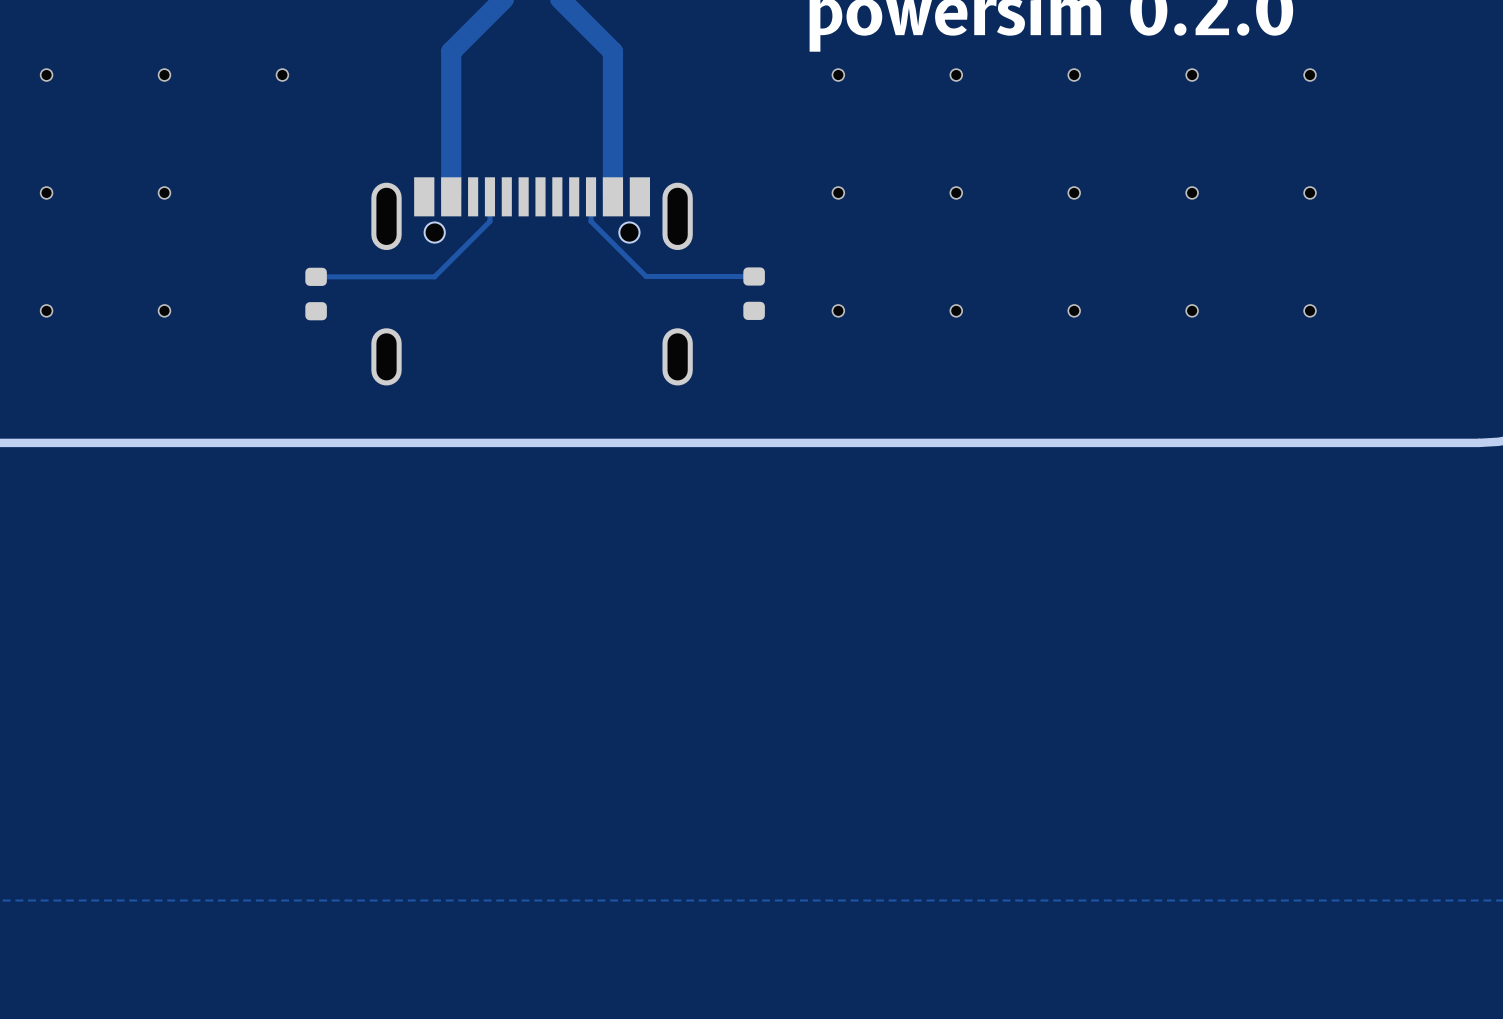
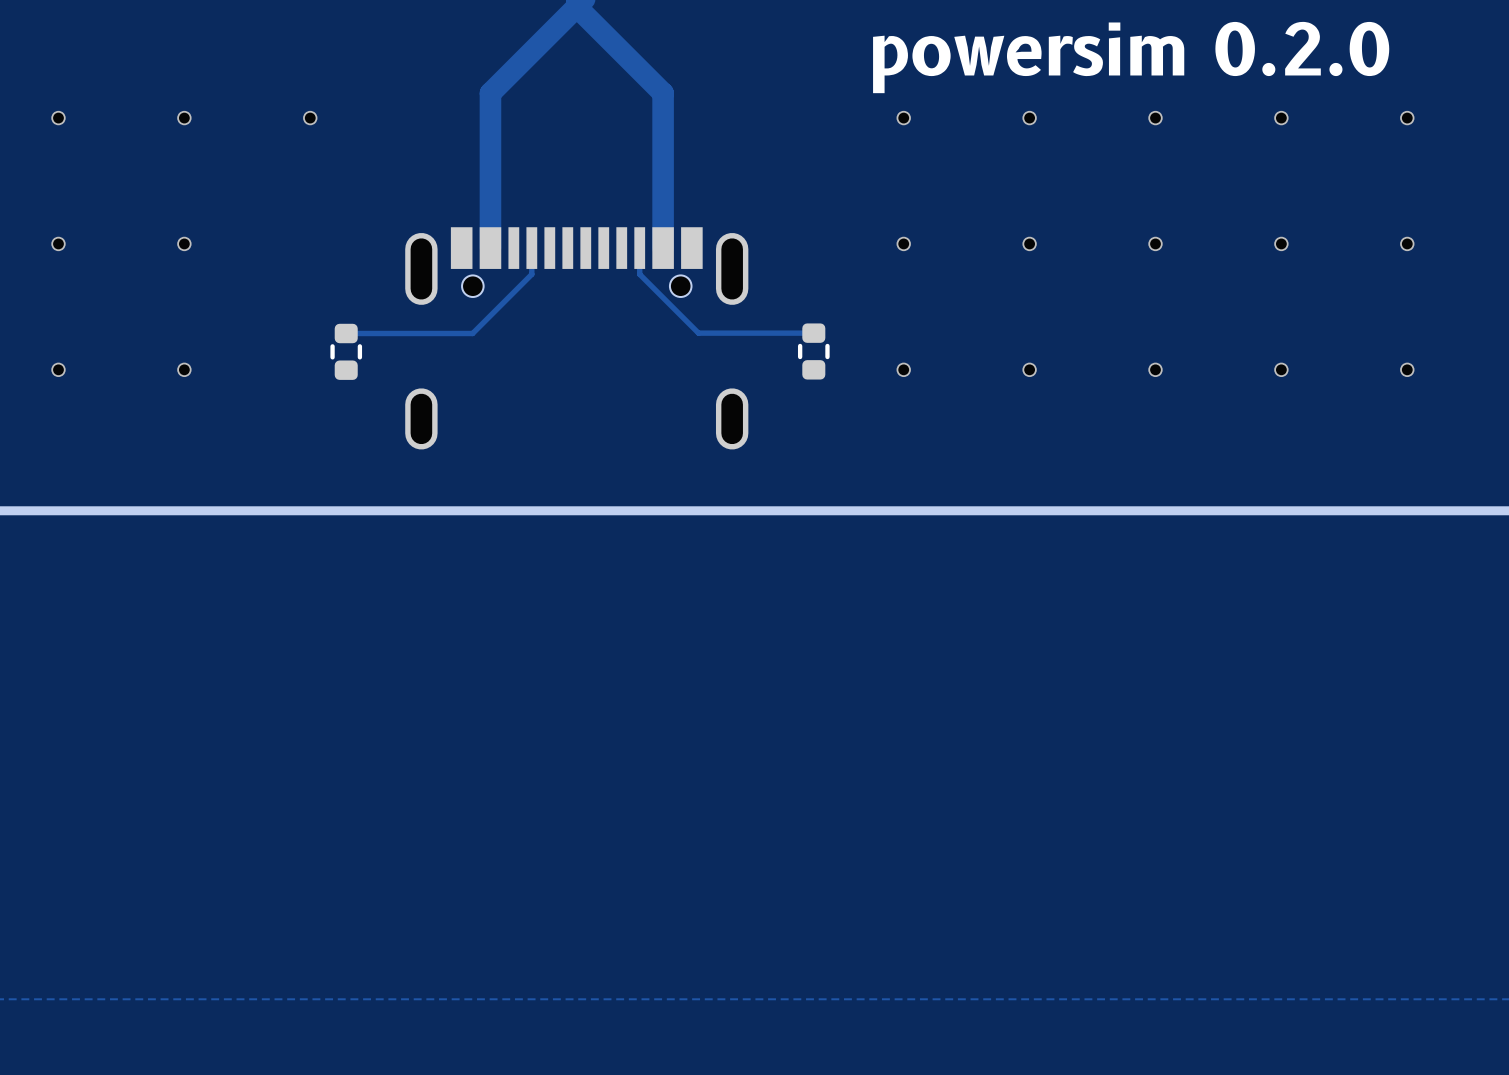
part footprint: [305, 267, 327, 321] -> [330, 323, 363, 380]
part footprint: [743, 267, 765, 320] -> [797, 323, 830, 380]

